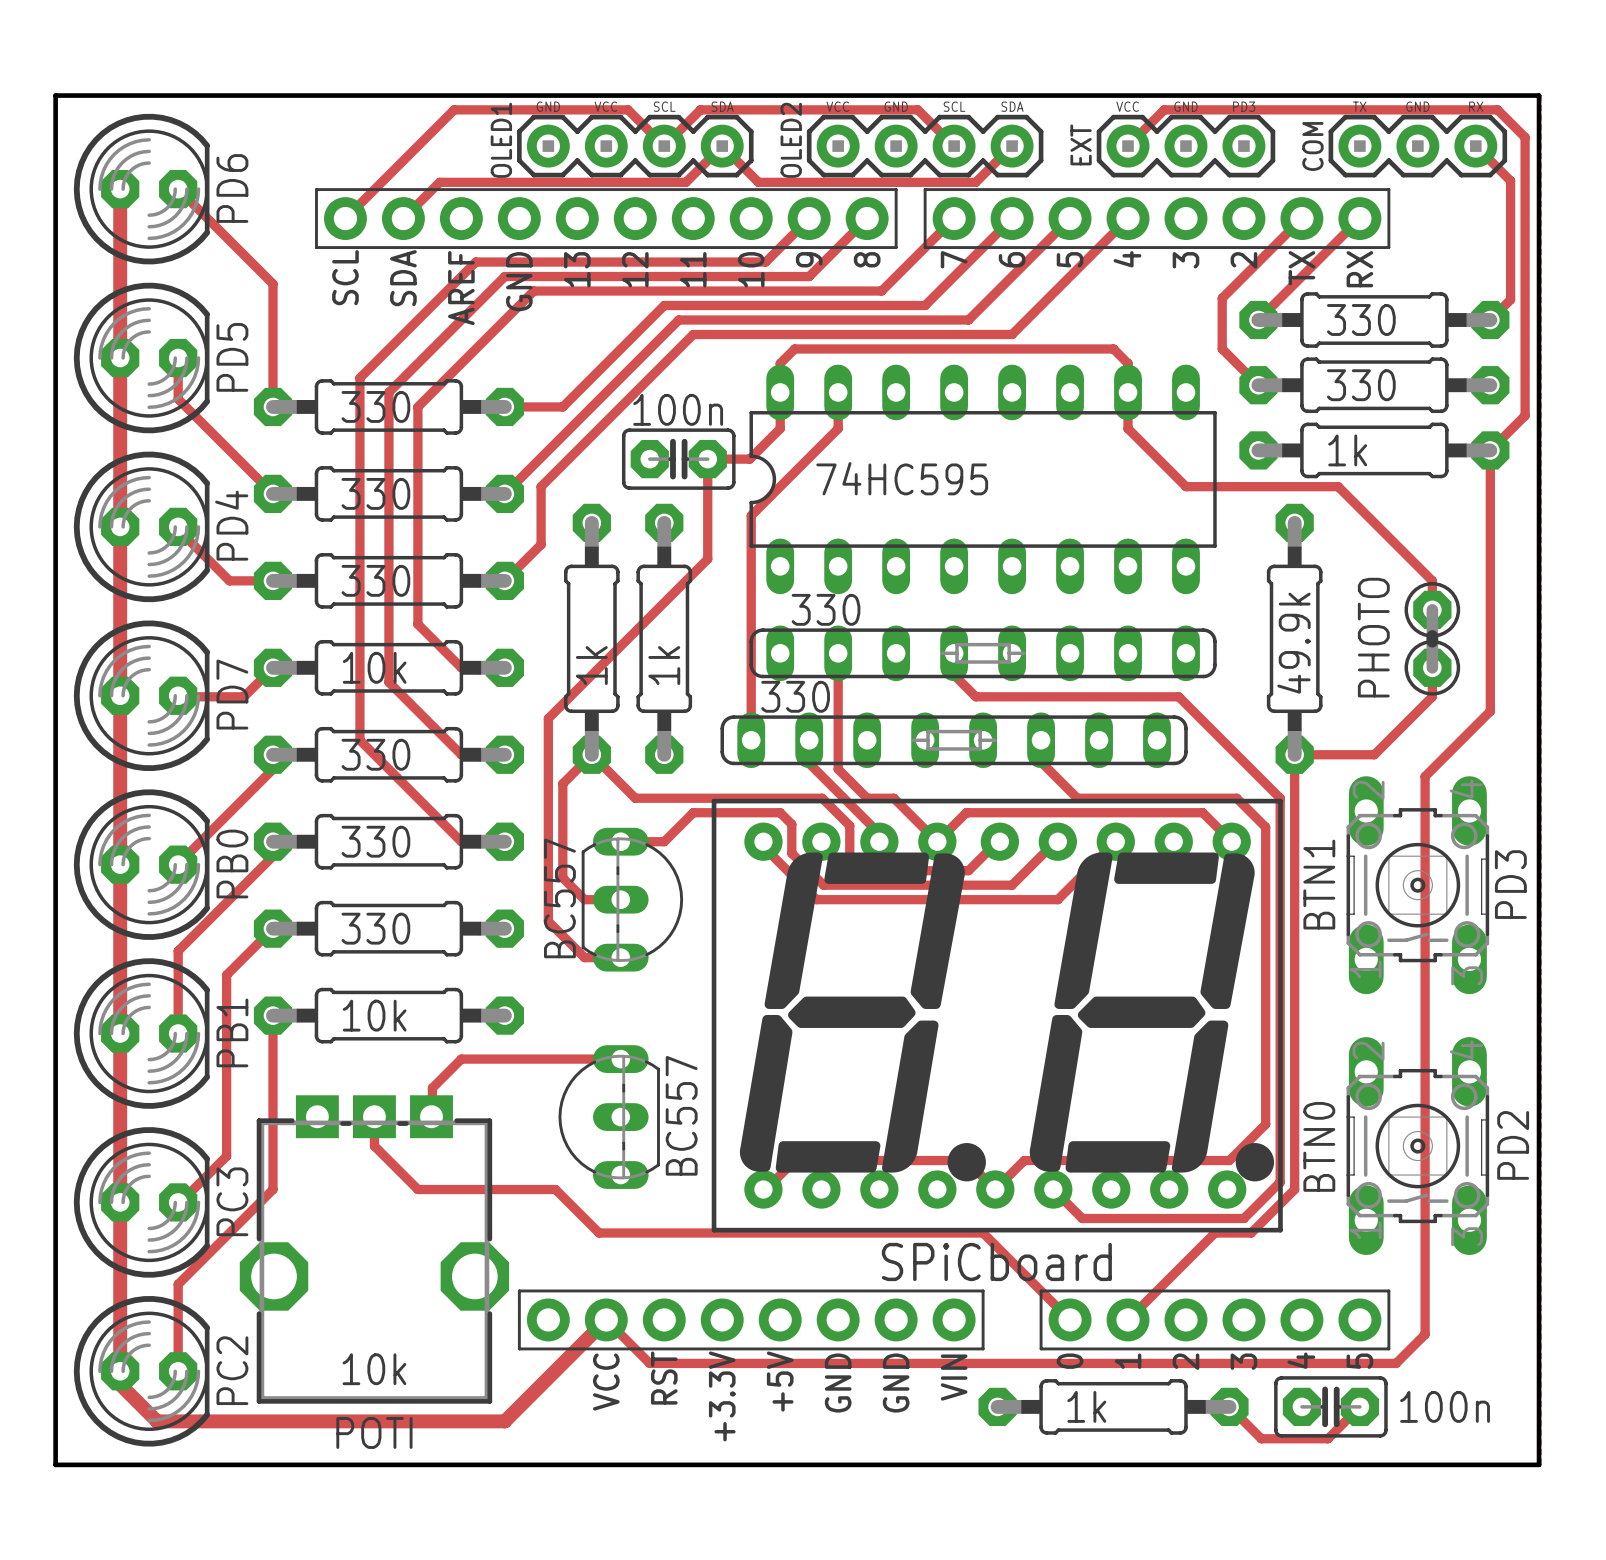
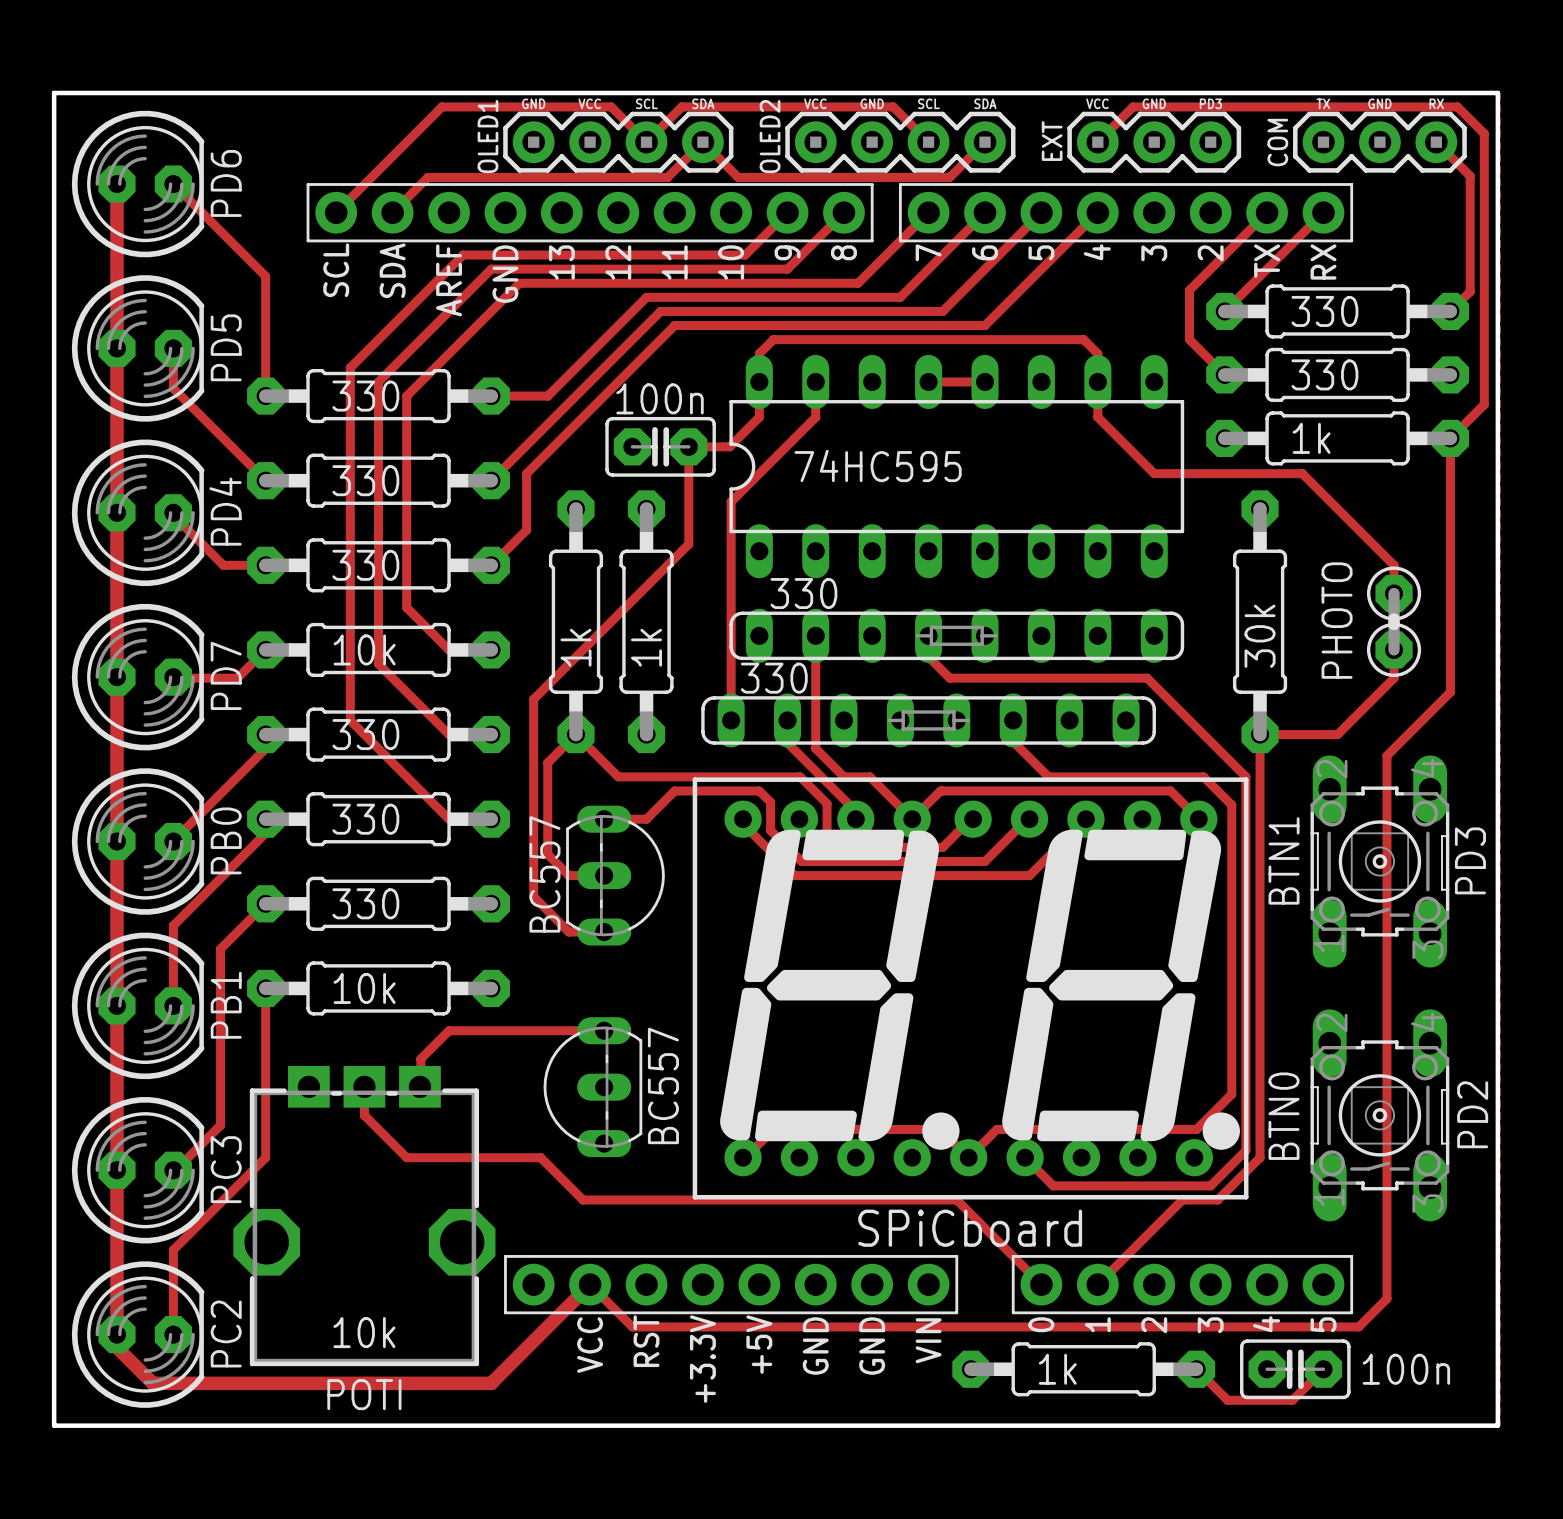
track: none -> (928, 381) (985, 381)
part value: 49.9k (1293, 643) -> 30k (1260, 636)

